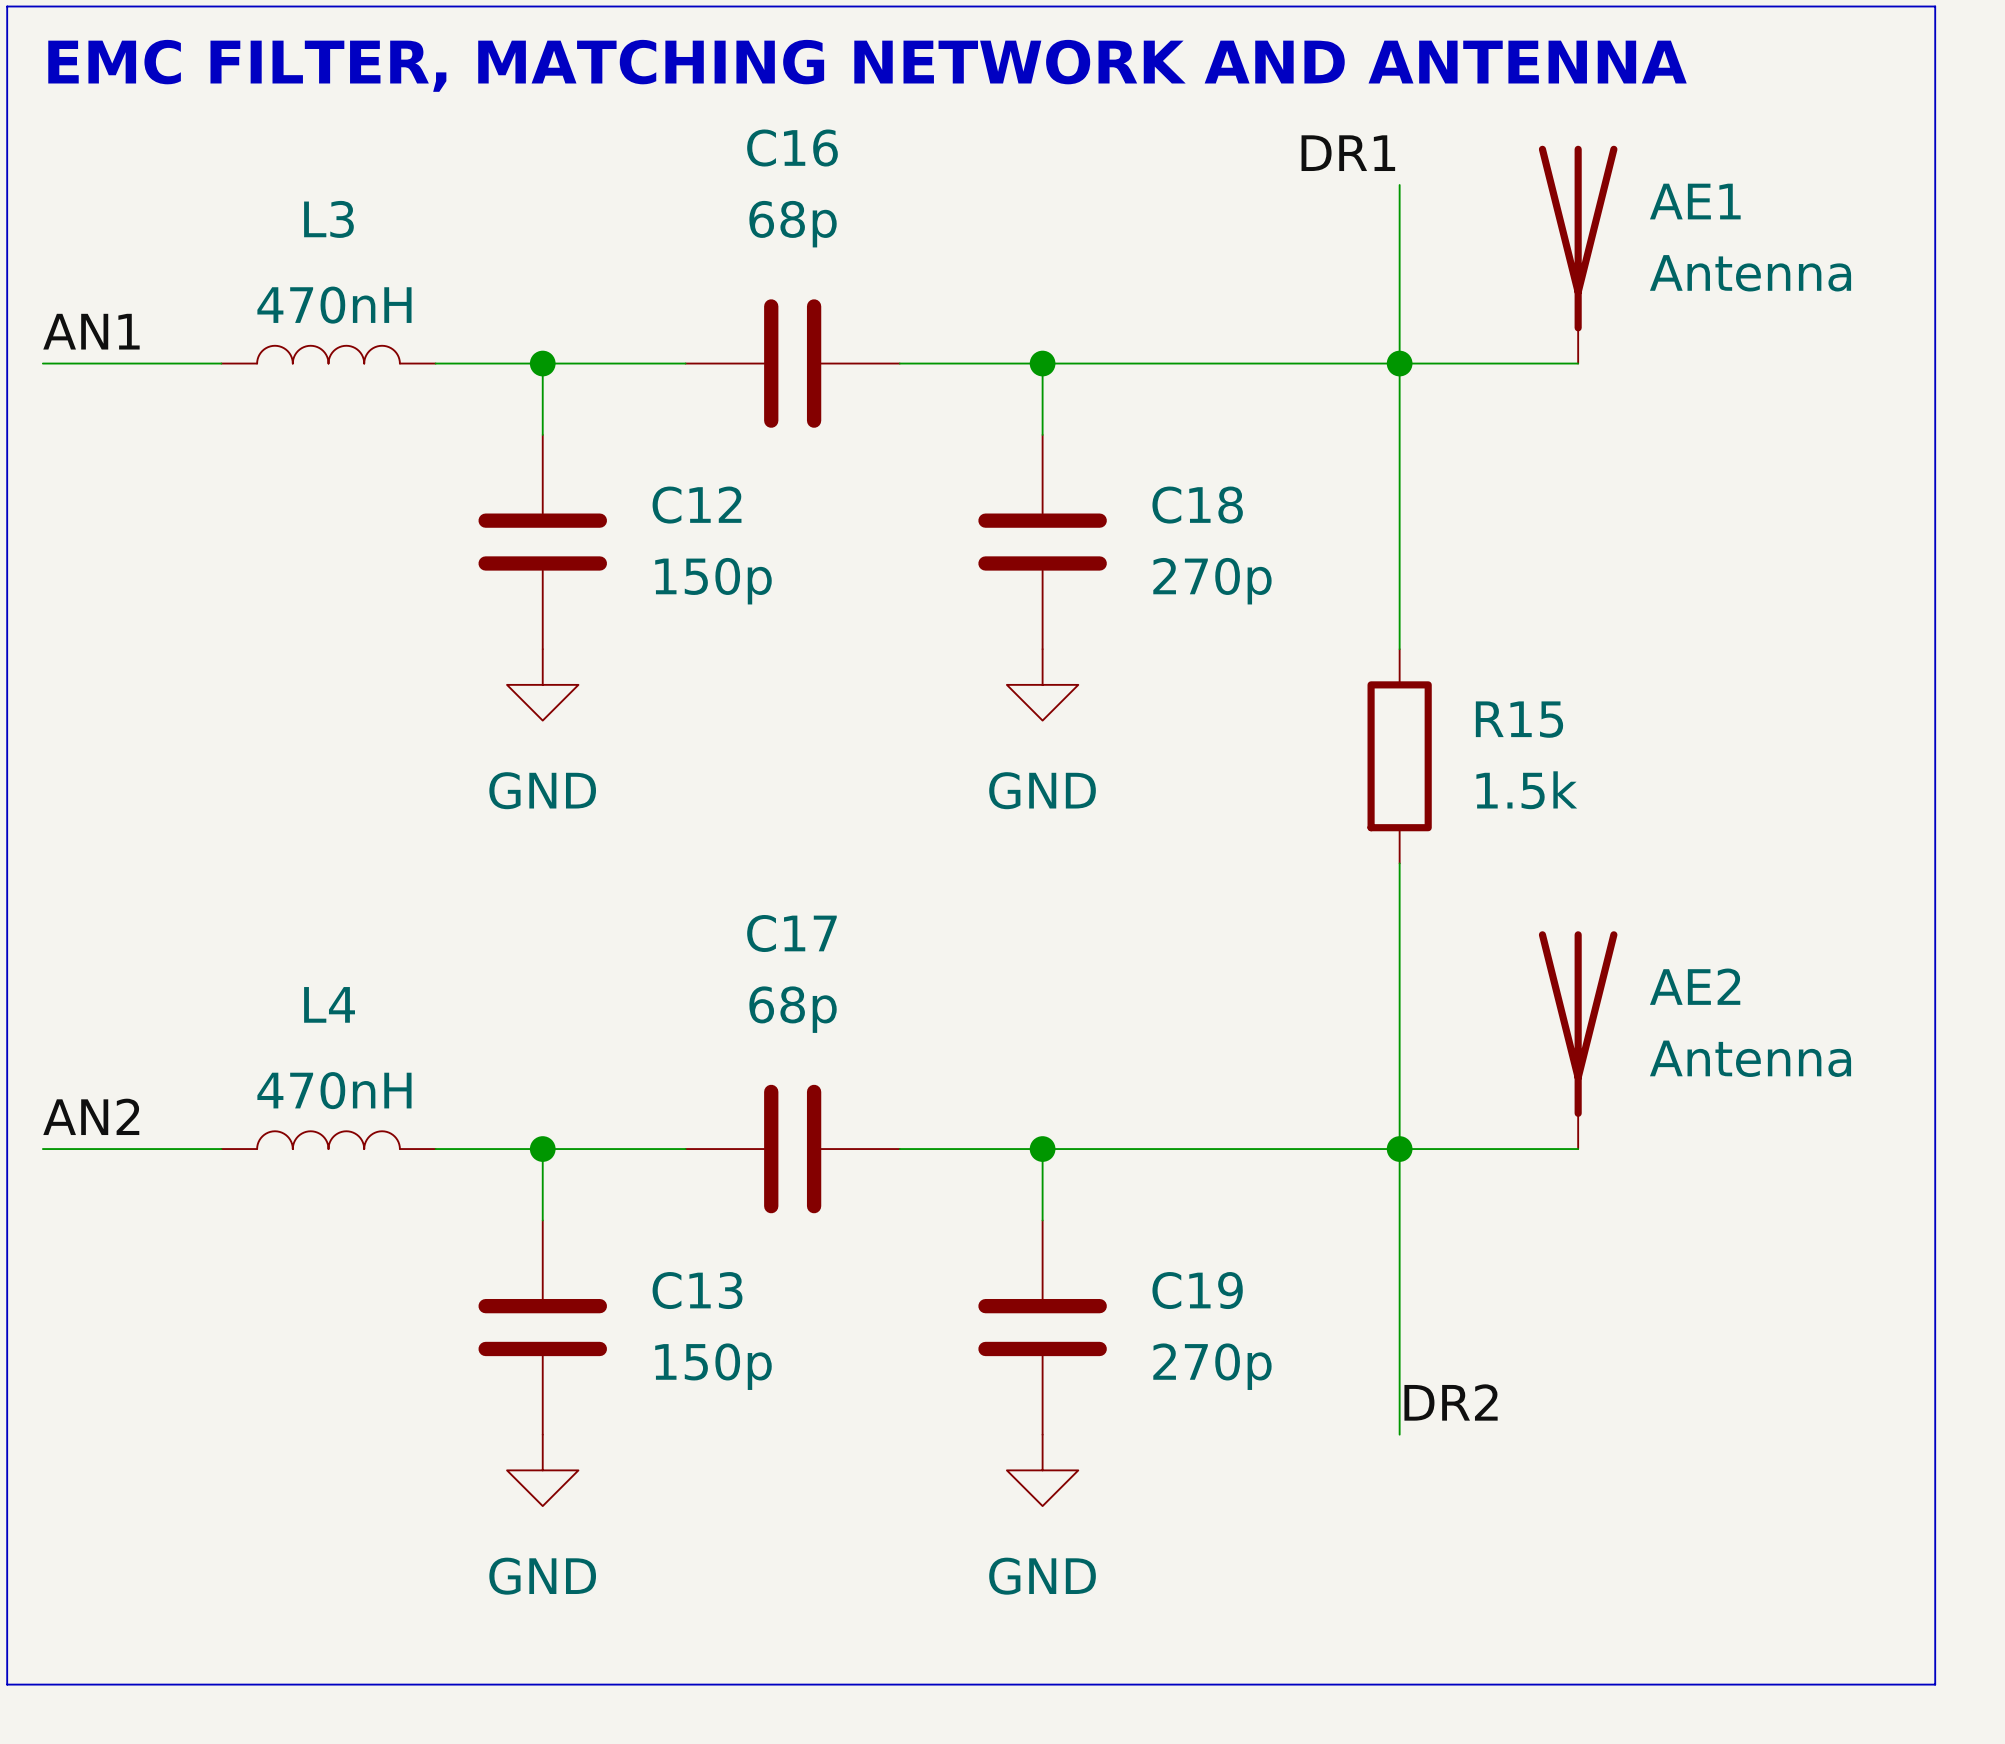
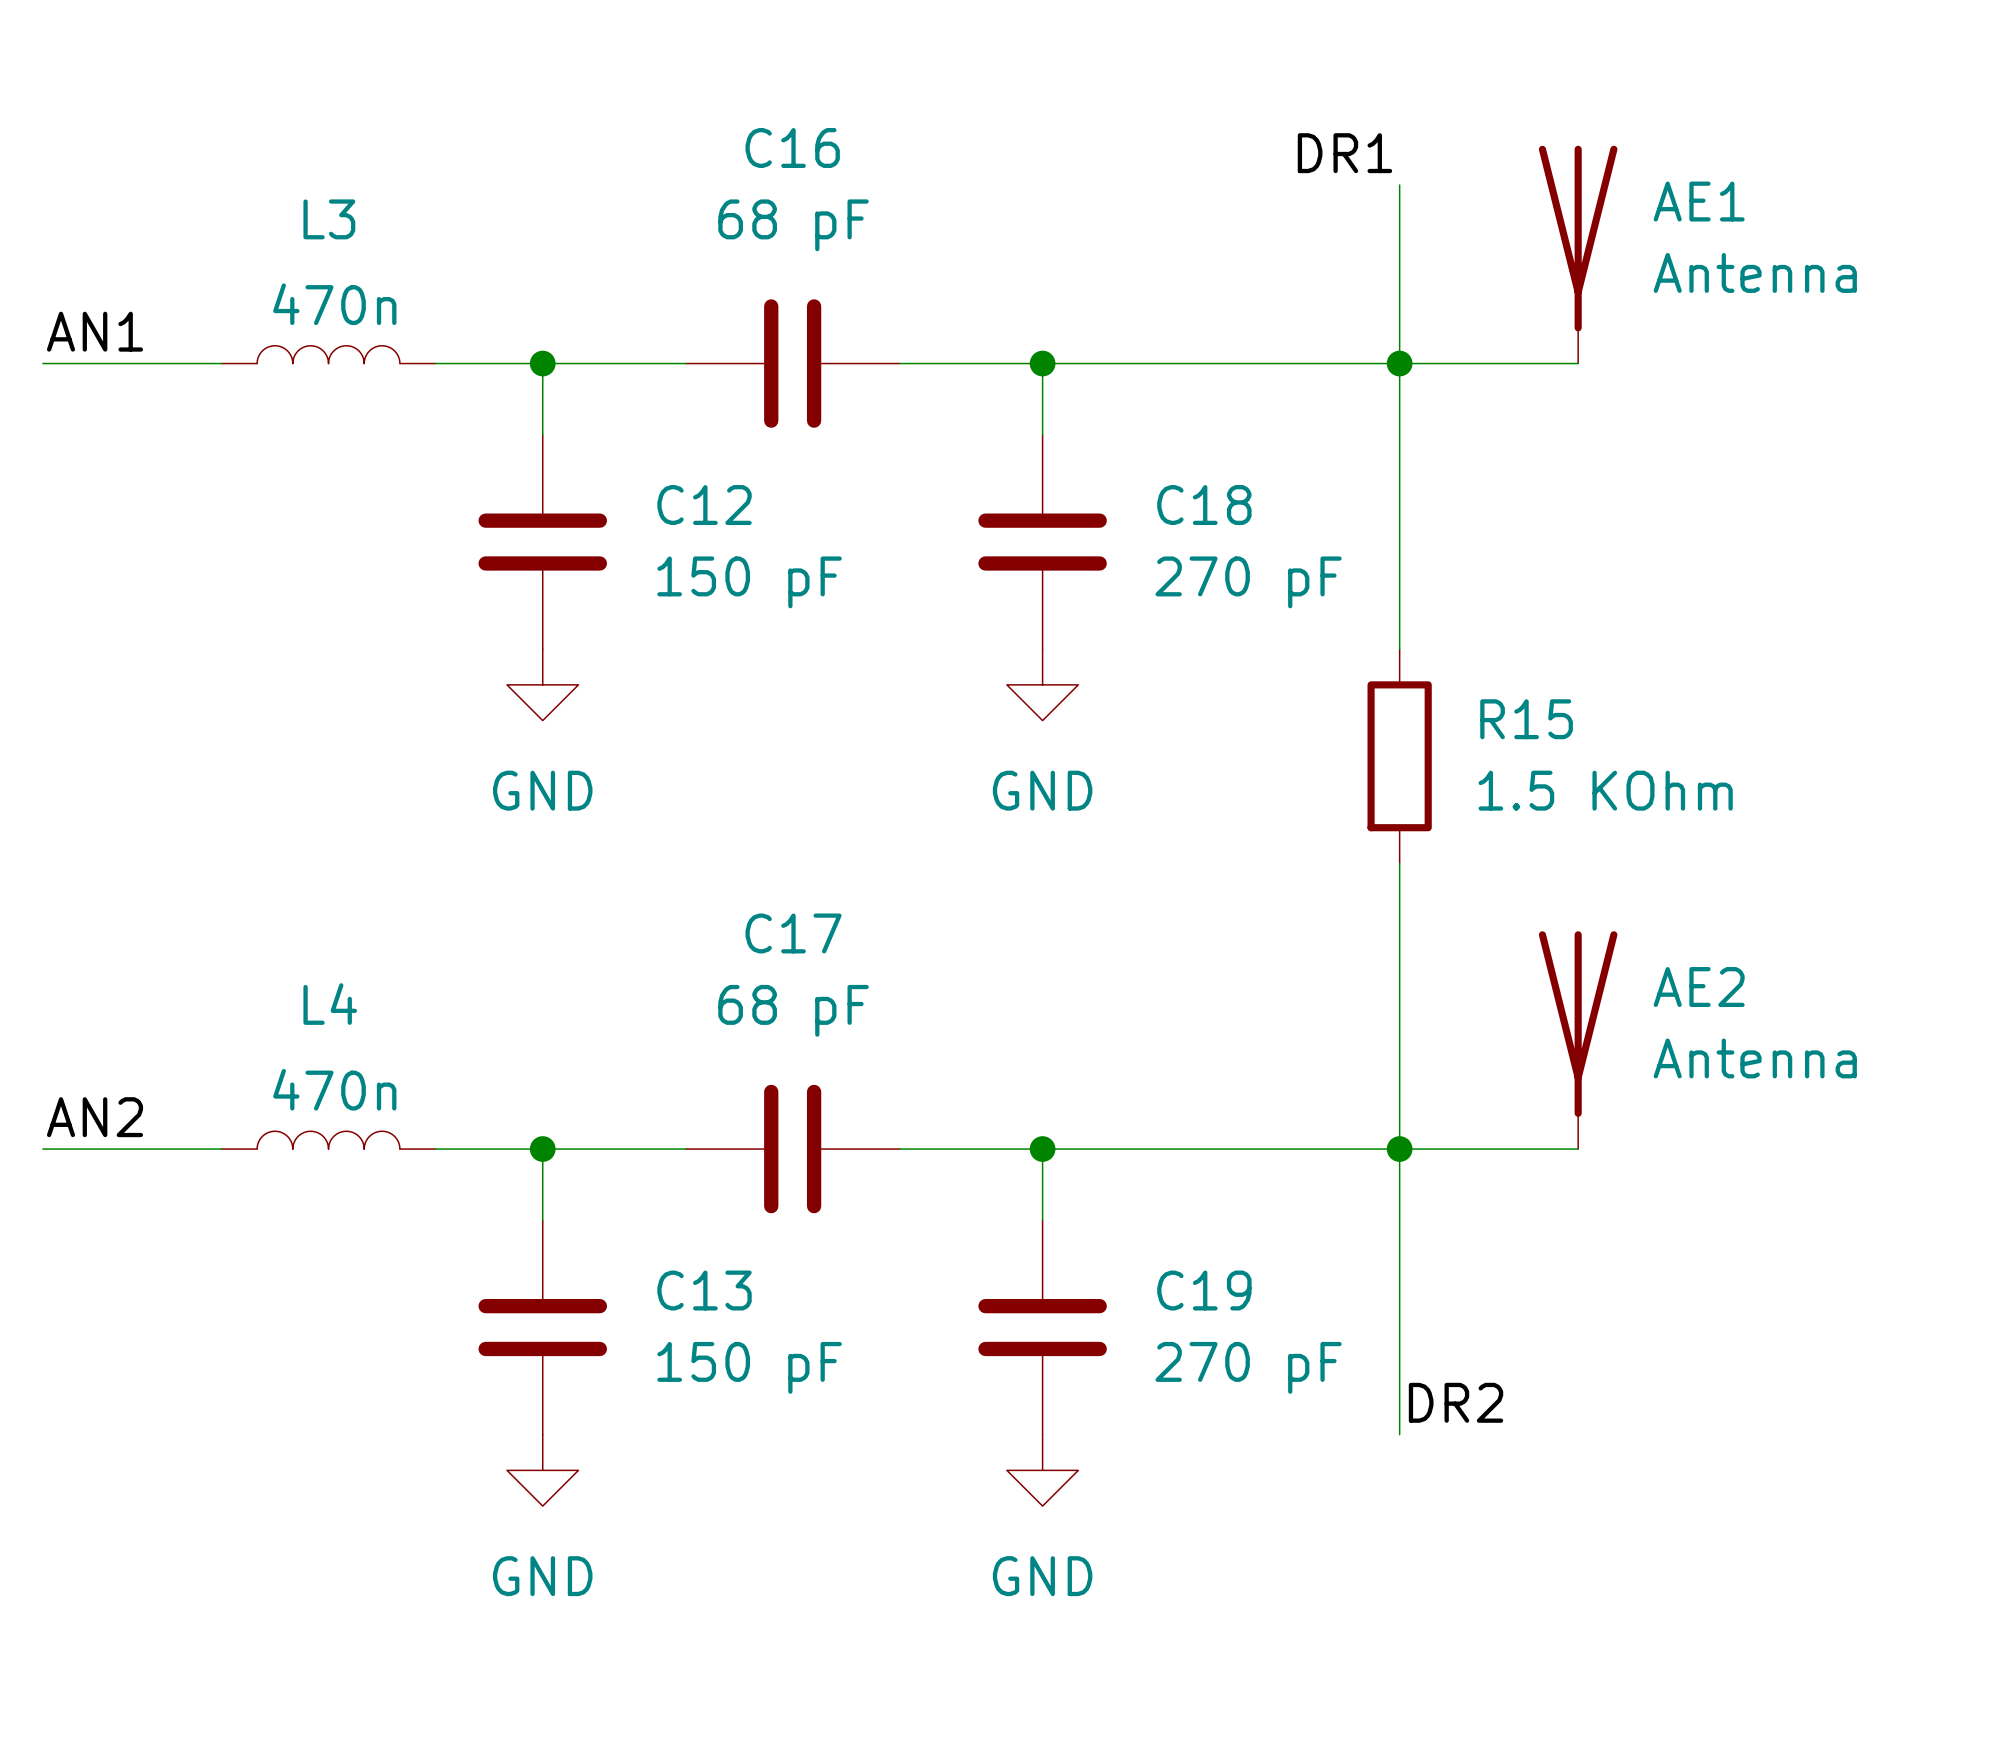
line: (7, 6) (1935, 6) (1935, 1684) (7, 1684) (7, 6) -> none
text: EMC FILTER, MATCHING NETWORK AND ANTENNA (867, 65) -> none
C16 value: 68p (793, 224) -> 68 pF (793, 225)
L3 value: 470nH (334, 305) -> 470n (334, 304)
C12 value: 150p (713, 581) -> 150 pF (749, 582)
C18 value: 270p (1212, 581) -> 270 pF (1248, 582)
R15 value: 1.5k (1526, 790) -> 1.5 KOhm (1605, 790)
C17 value: 68p (793, 1009) -> 68 pF (793, 1010)
L4 value: 470nH (334, 1090) -> 470n (334, 1089)
C13 value: 150p (713, 1366) -> 150 pF (749, 1367)
C19 value: 270p (1212, 1366) -> 270 pF (1248, 1367)

